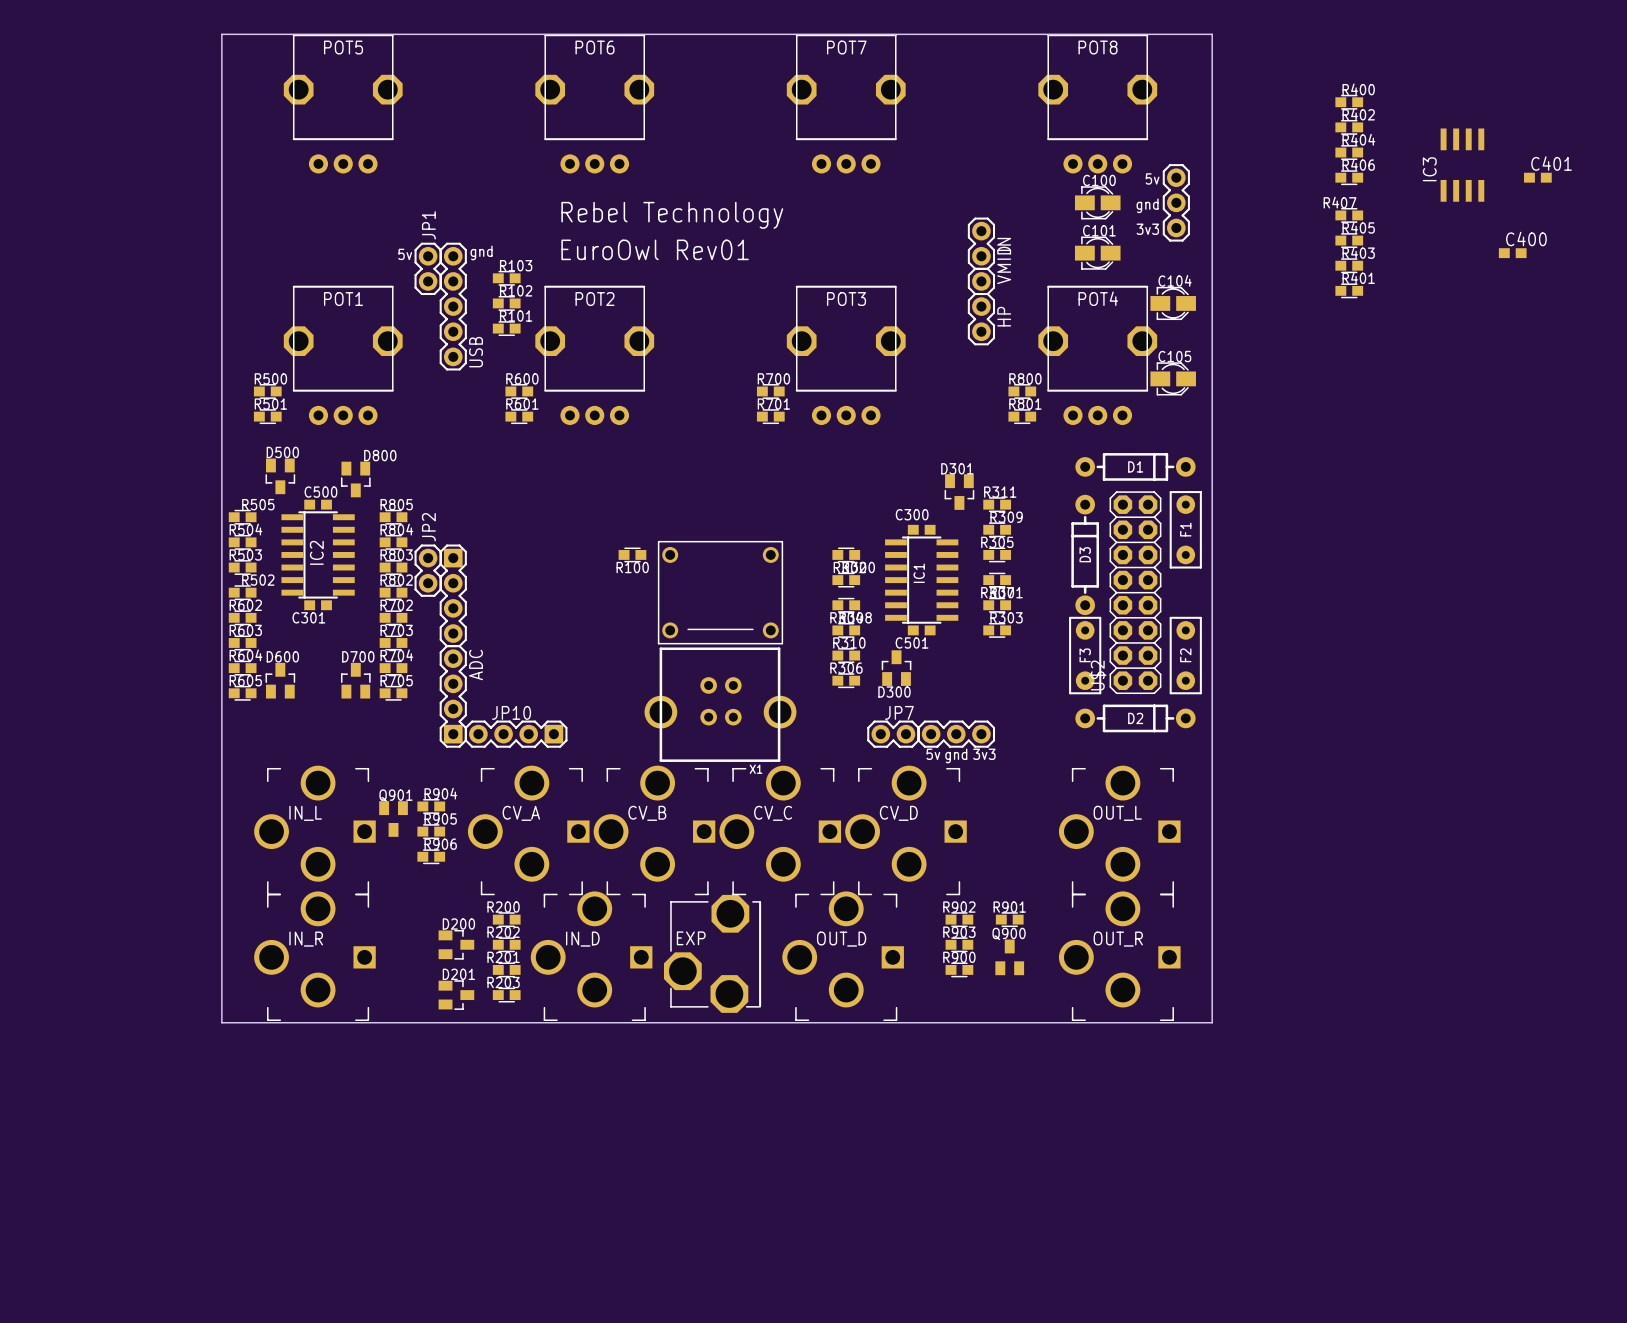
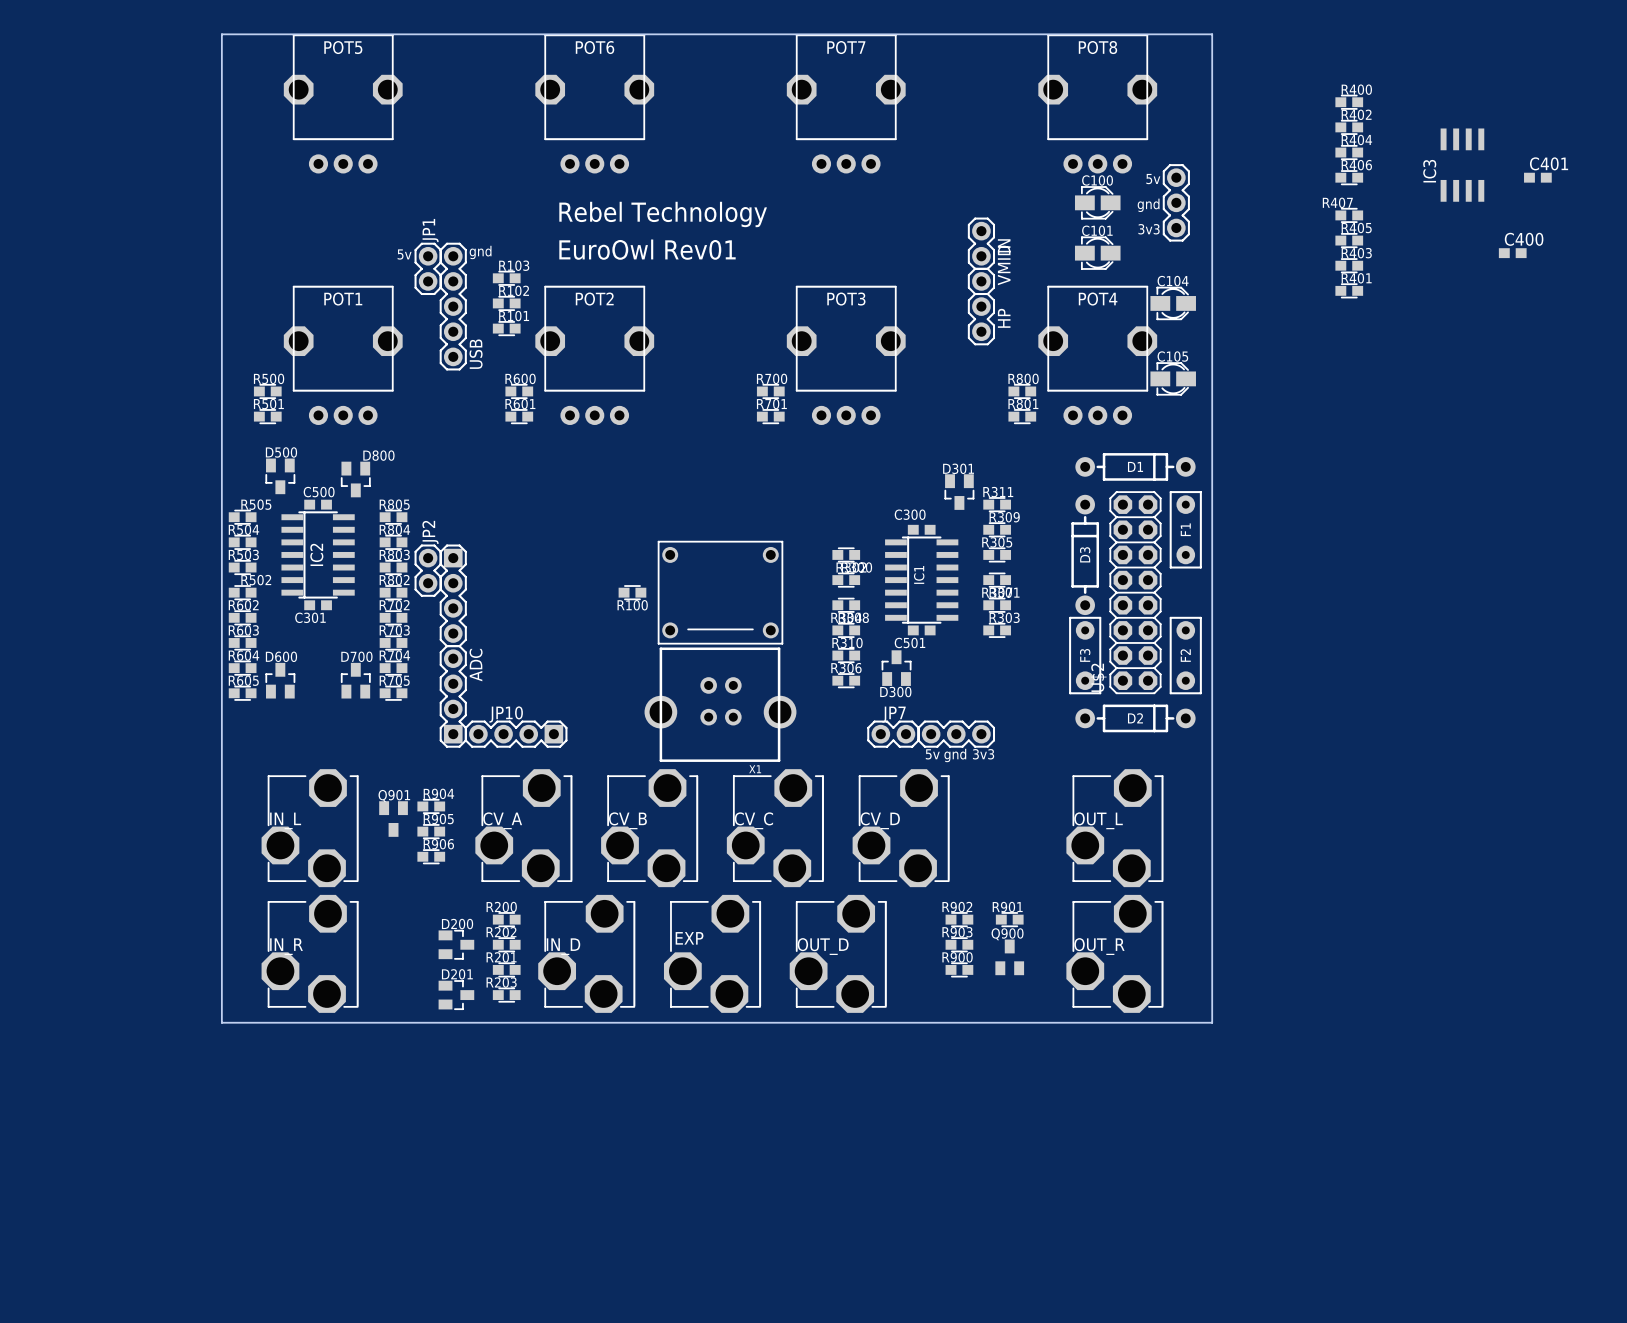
R100 position: (632, 554) -> (632, 592)
IN_L footprint: [254, 765, 376, 896] -> [261, 769, 359, 888]
CV_A footprint: [467, 765, 590, 896] -> [475, 769, 573, 888]
CV_B footprint: [593, 765, 716, 896] -> [601, 769, 699, 888]
CV_C footprint: [719, 765, 842, 896] -> [726, 769, 824, 888]
CV_D footprint: [845, 765, 967, 896] -> [852, 769, 950, 888]
OUT_L footprint: [1058, 765, 1181, 896] -> [1066, 769, 1164, 888]
IN_R footprint: [254, 891, 376, 1021] -> [261, 894, 359, 1013]
IN_D footprint: [530, 891, 653, 1021] -> [538, 894, 636, 1013]
OUT_D footprint: [782, 891, 904, 1021] -> [789, 894, 887, 1013]
OUT_R footprint: [1058, 891, 1181, 1021] -> [1066, 894, 1164, 1013]

